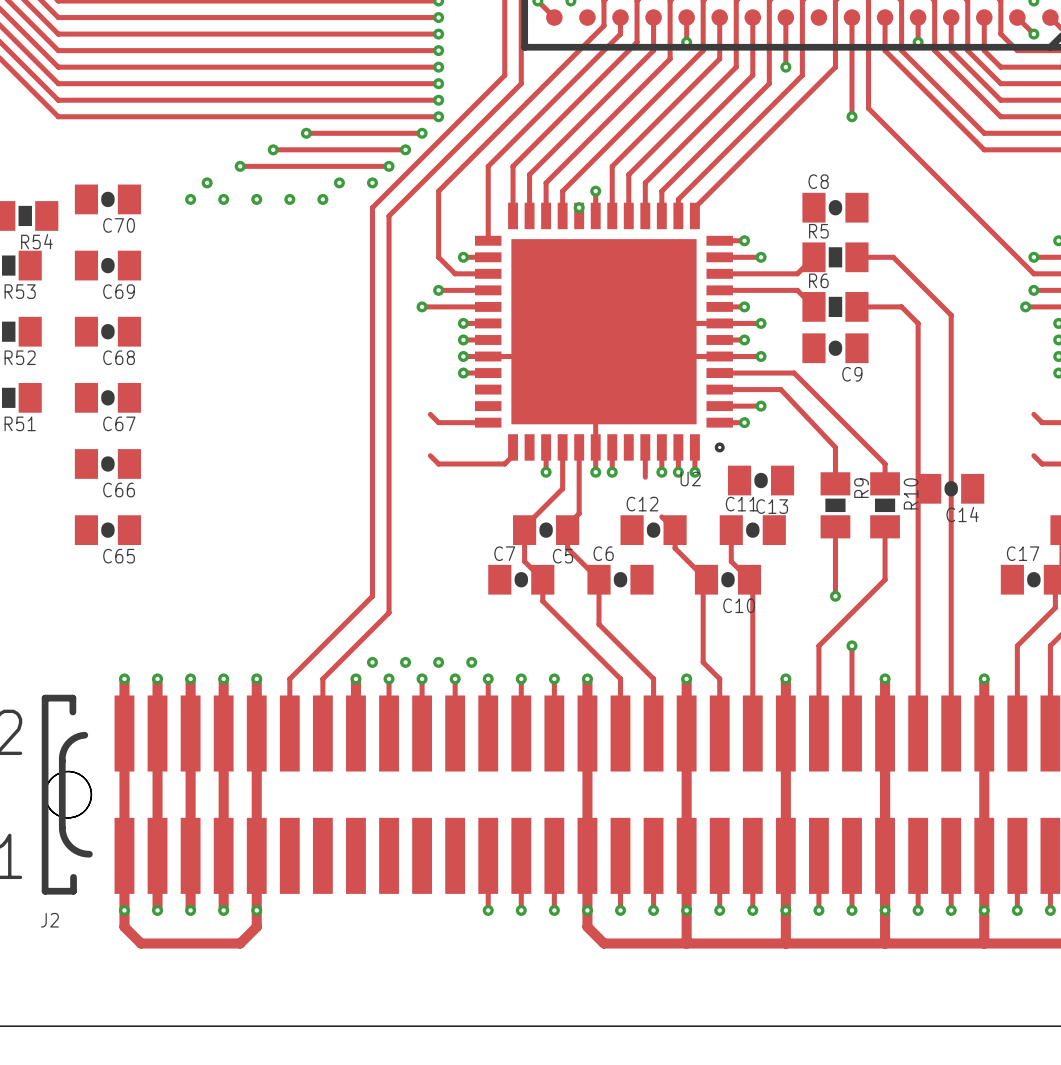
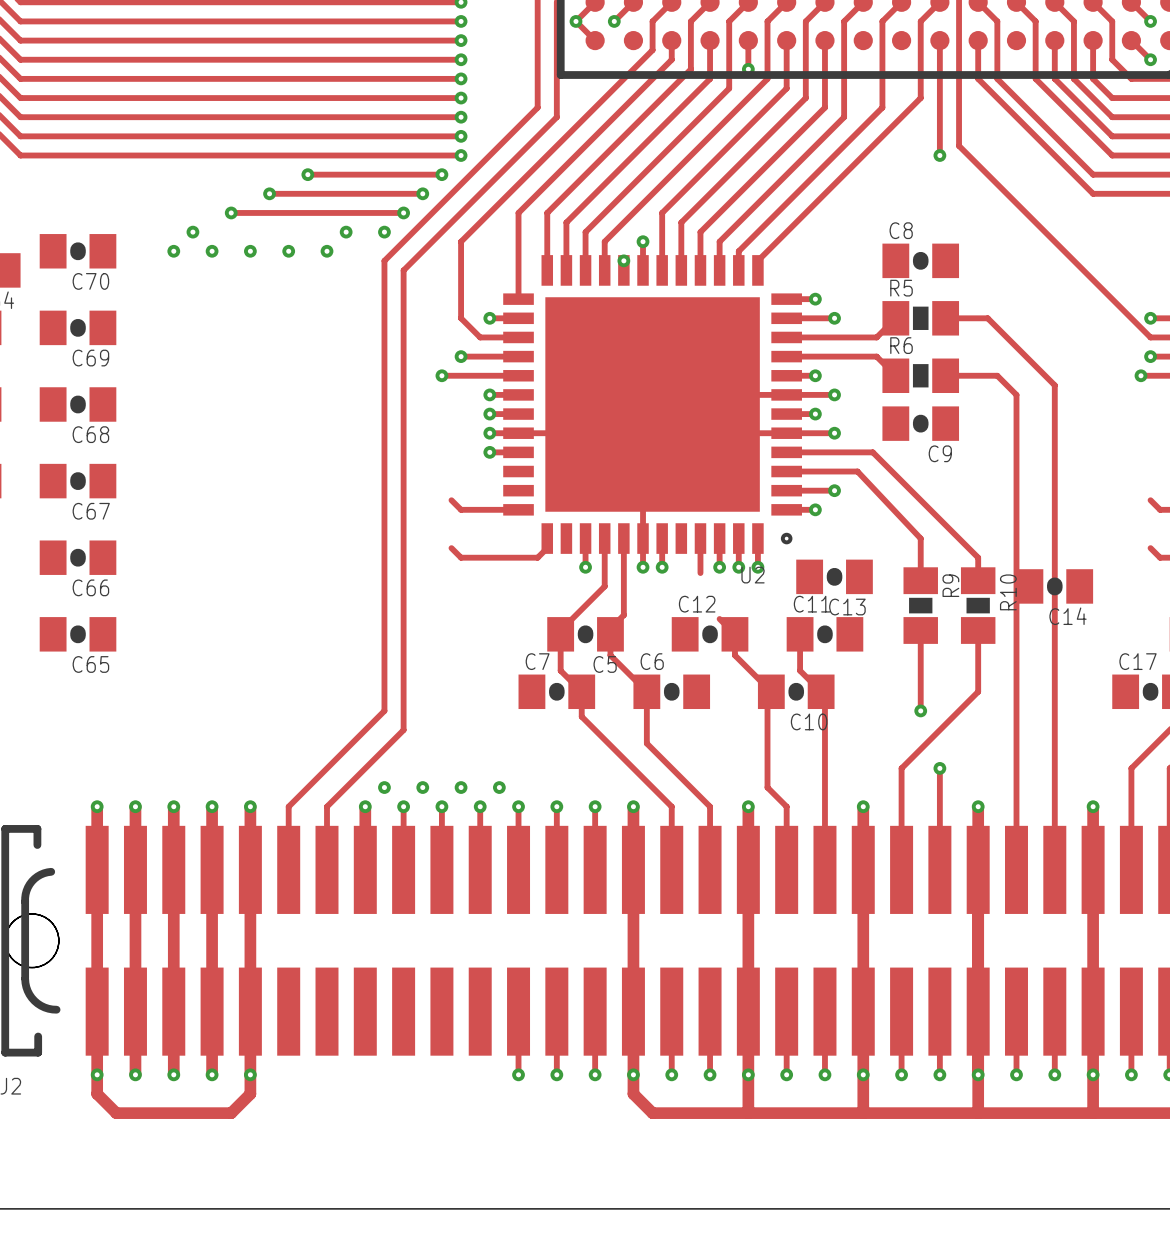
track: (785, 17) (785, 67) -> none
track: (918, 17) (918, 42) -> none
via: (918, 42) -> none
via: (785, 67) -> none

